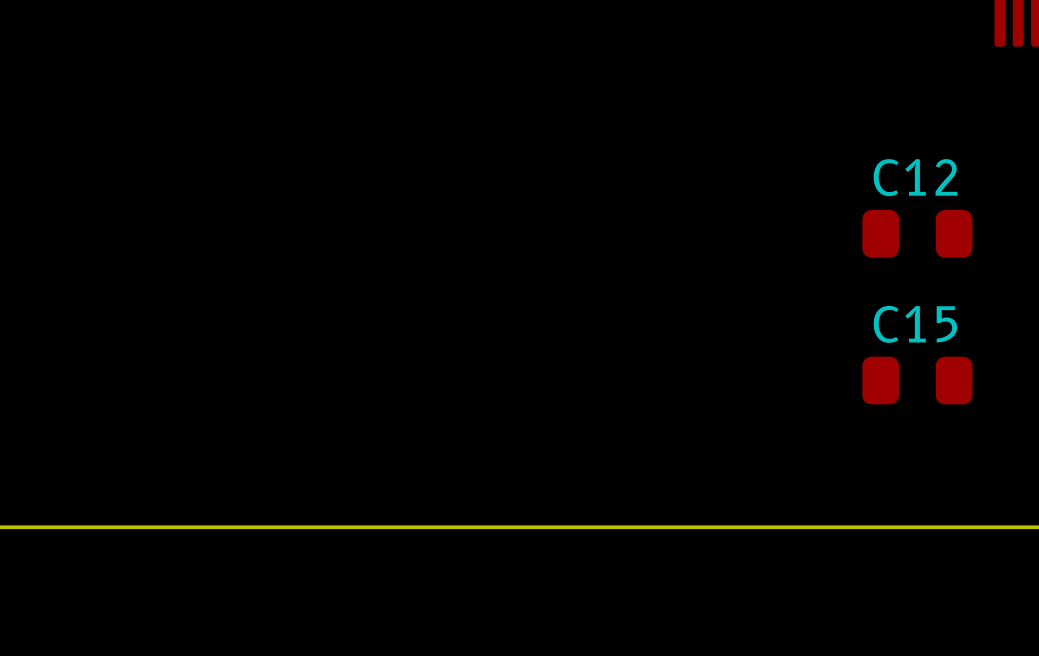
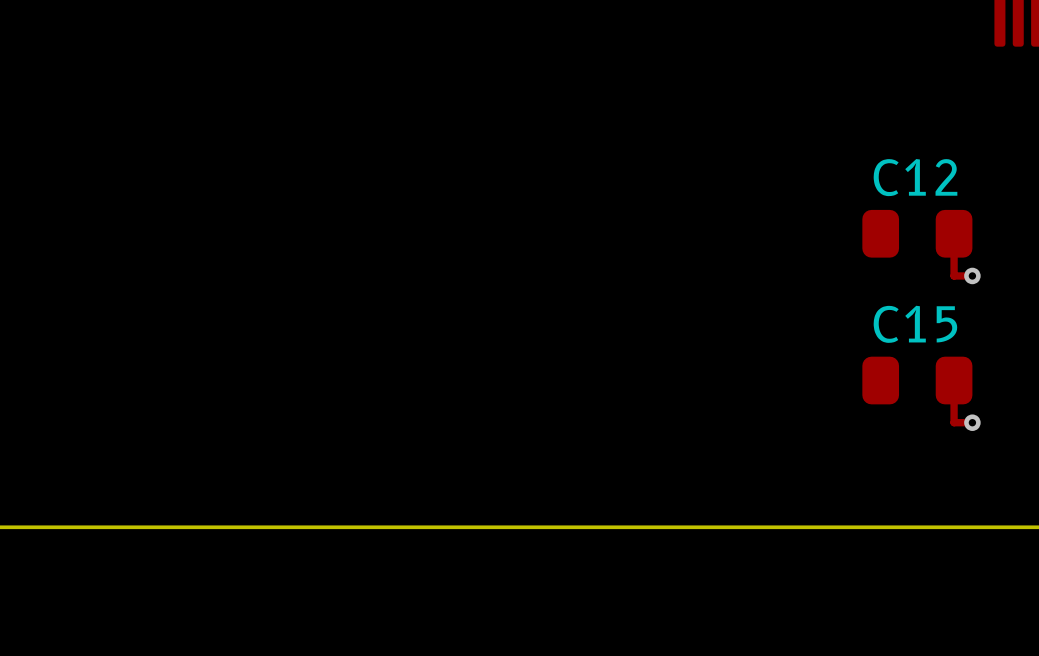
track: none -> (954, 233) (954, 275) (972, 275)
via: none -> (972, 275)
track: none -> (954, 380) (954, 422) (972, 422)
via: none -> (972, 422)

